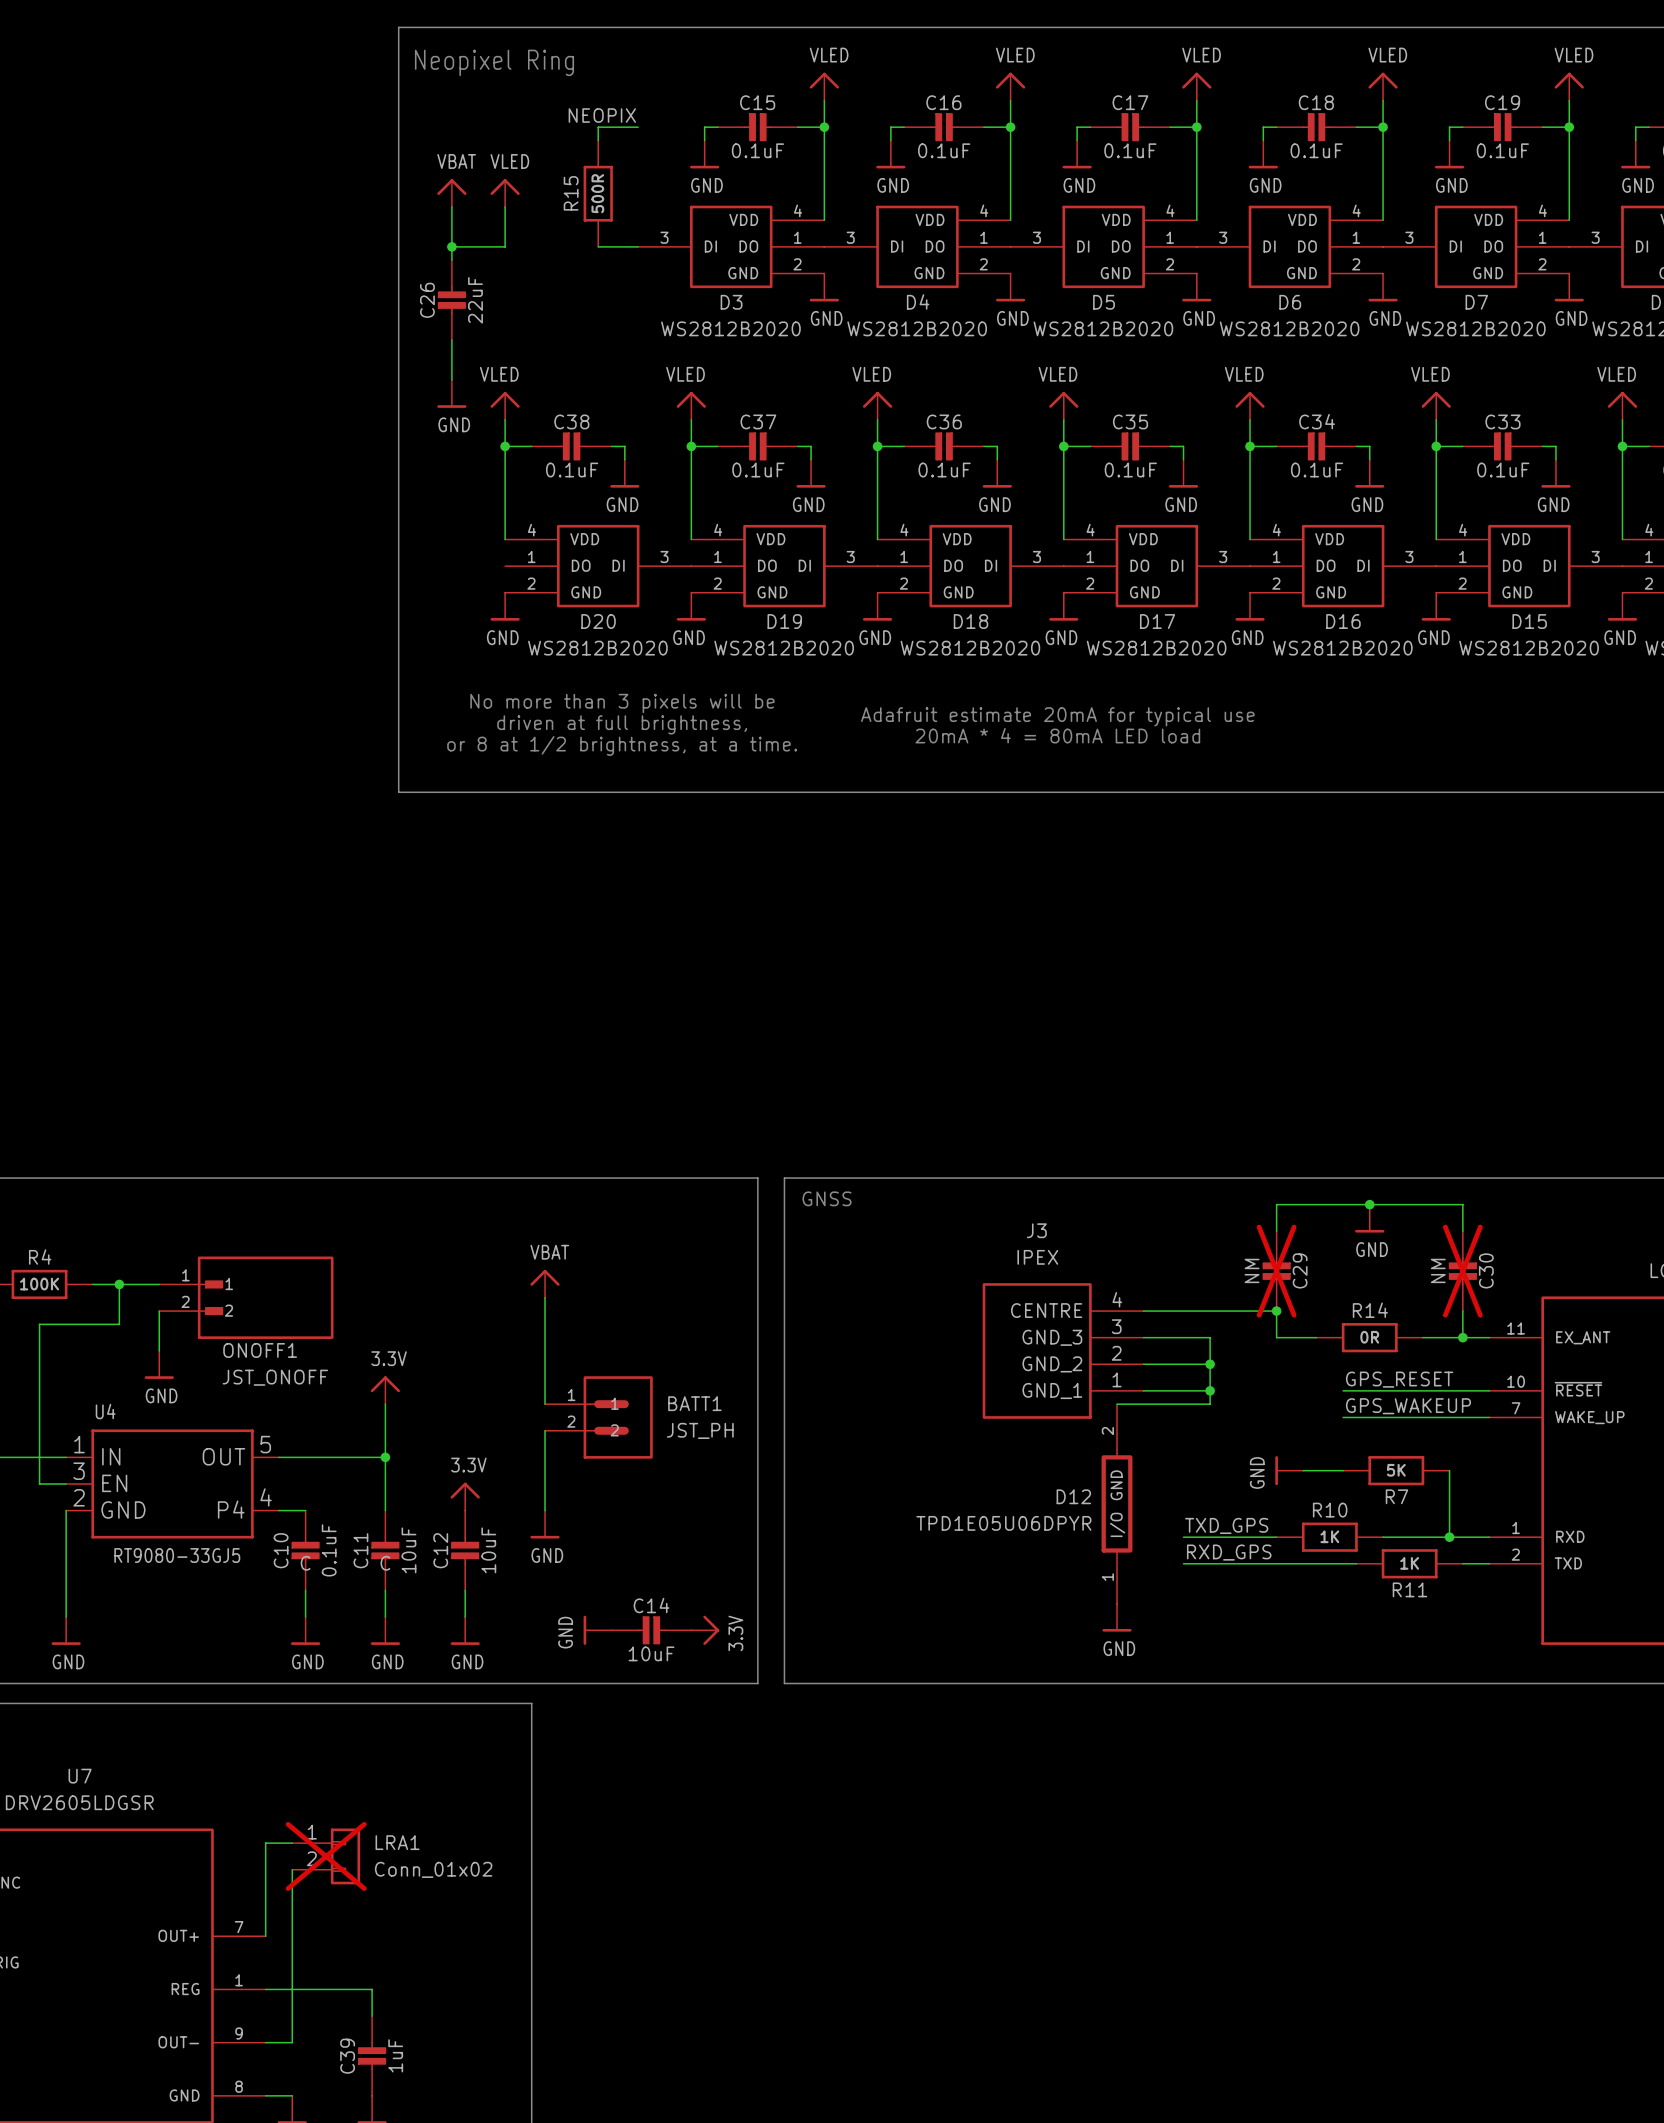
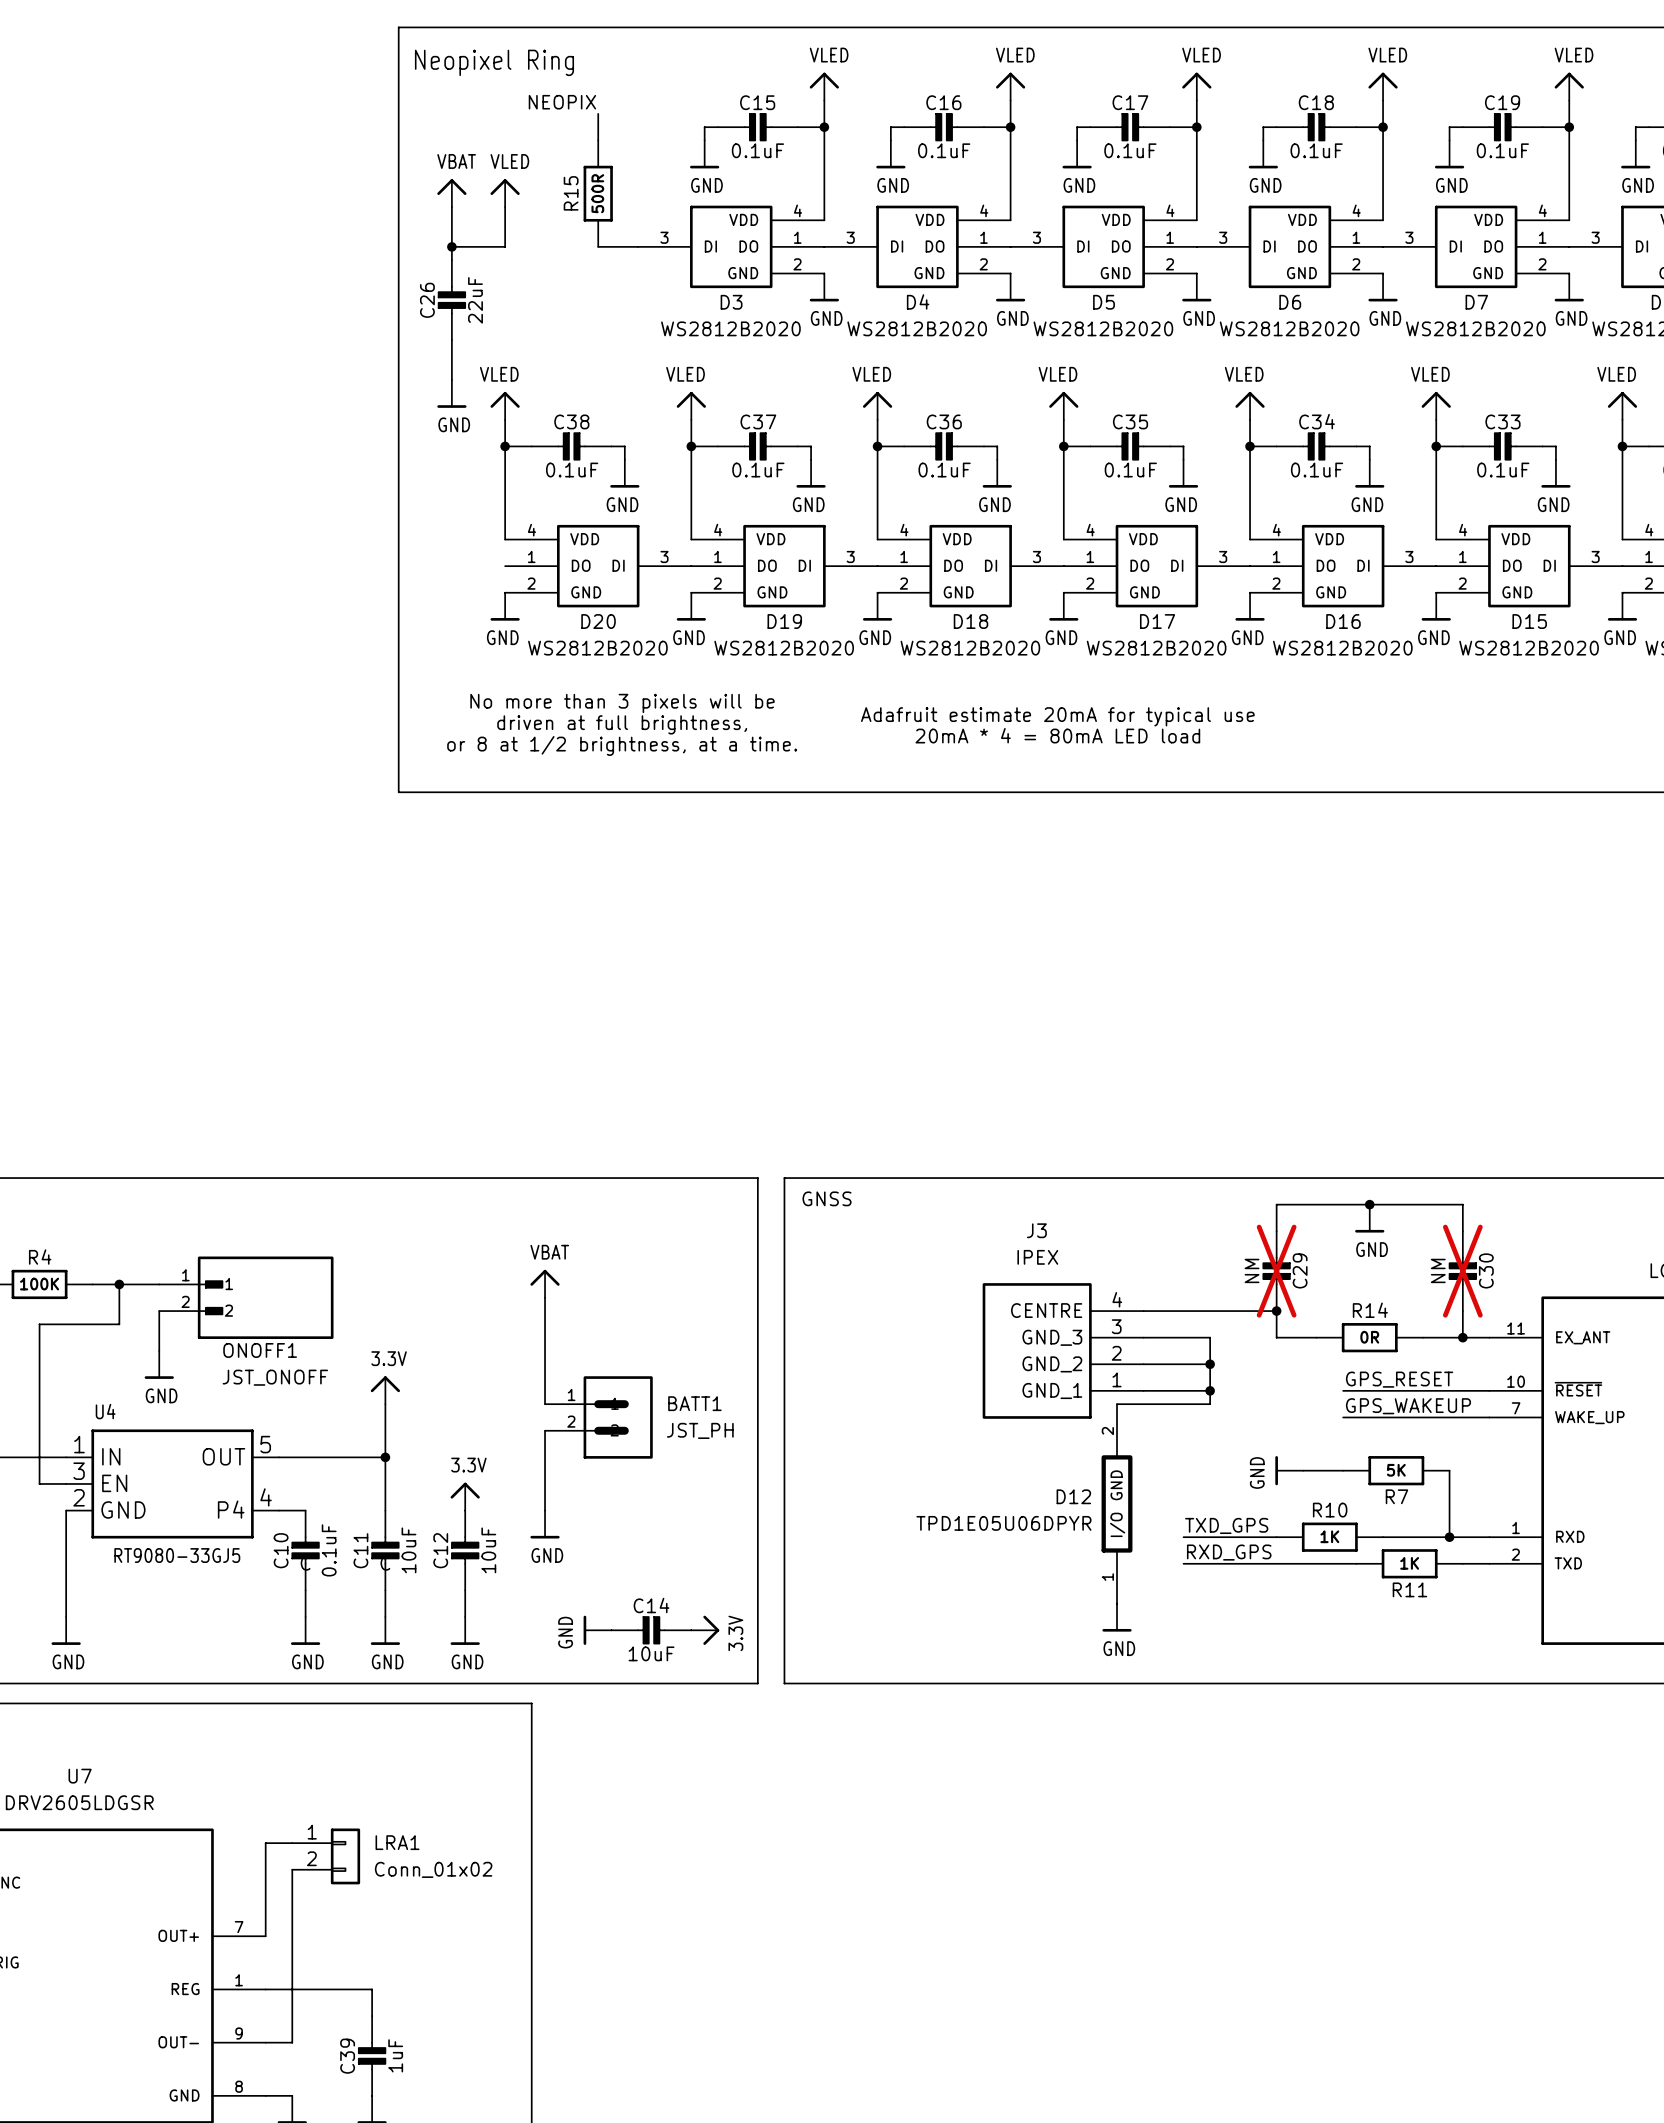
label position: NEOPIX (602, 115) -> NEOPIX (562, 102)
wire: (598, 127) (638, 127) -> (598, 127) (598, 113)
LRA1 do-not-place cross: (326, 1856) -> none

